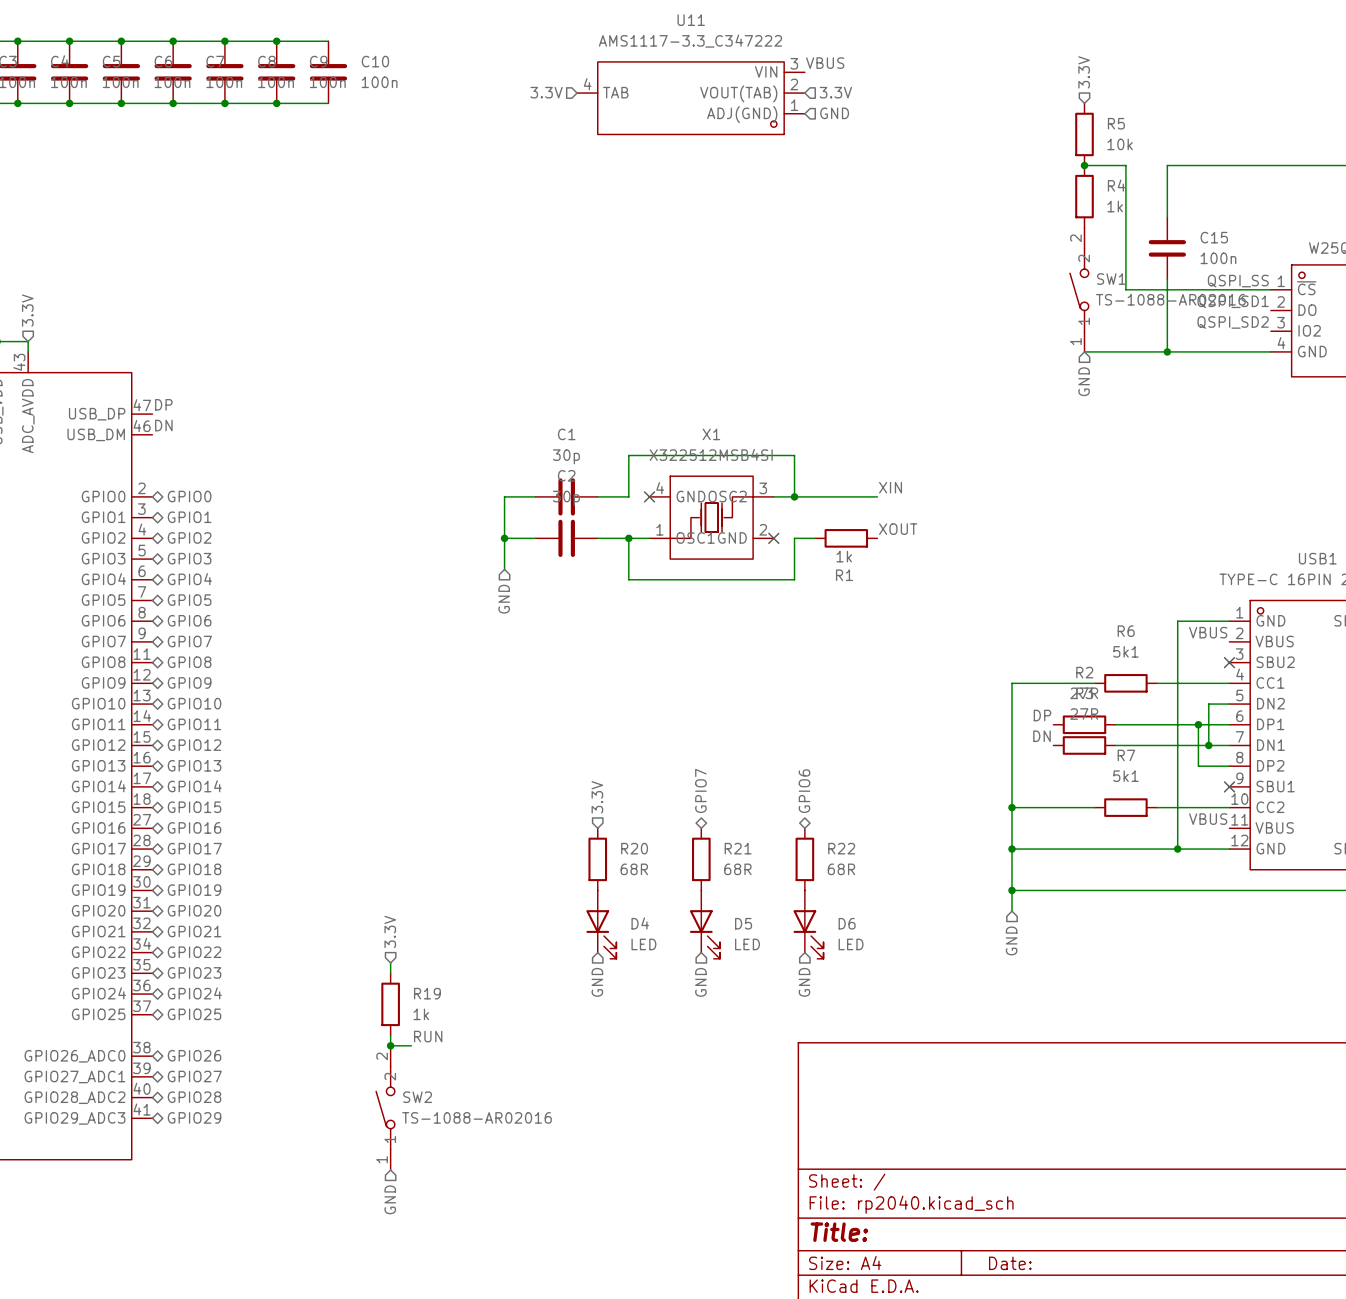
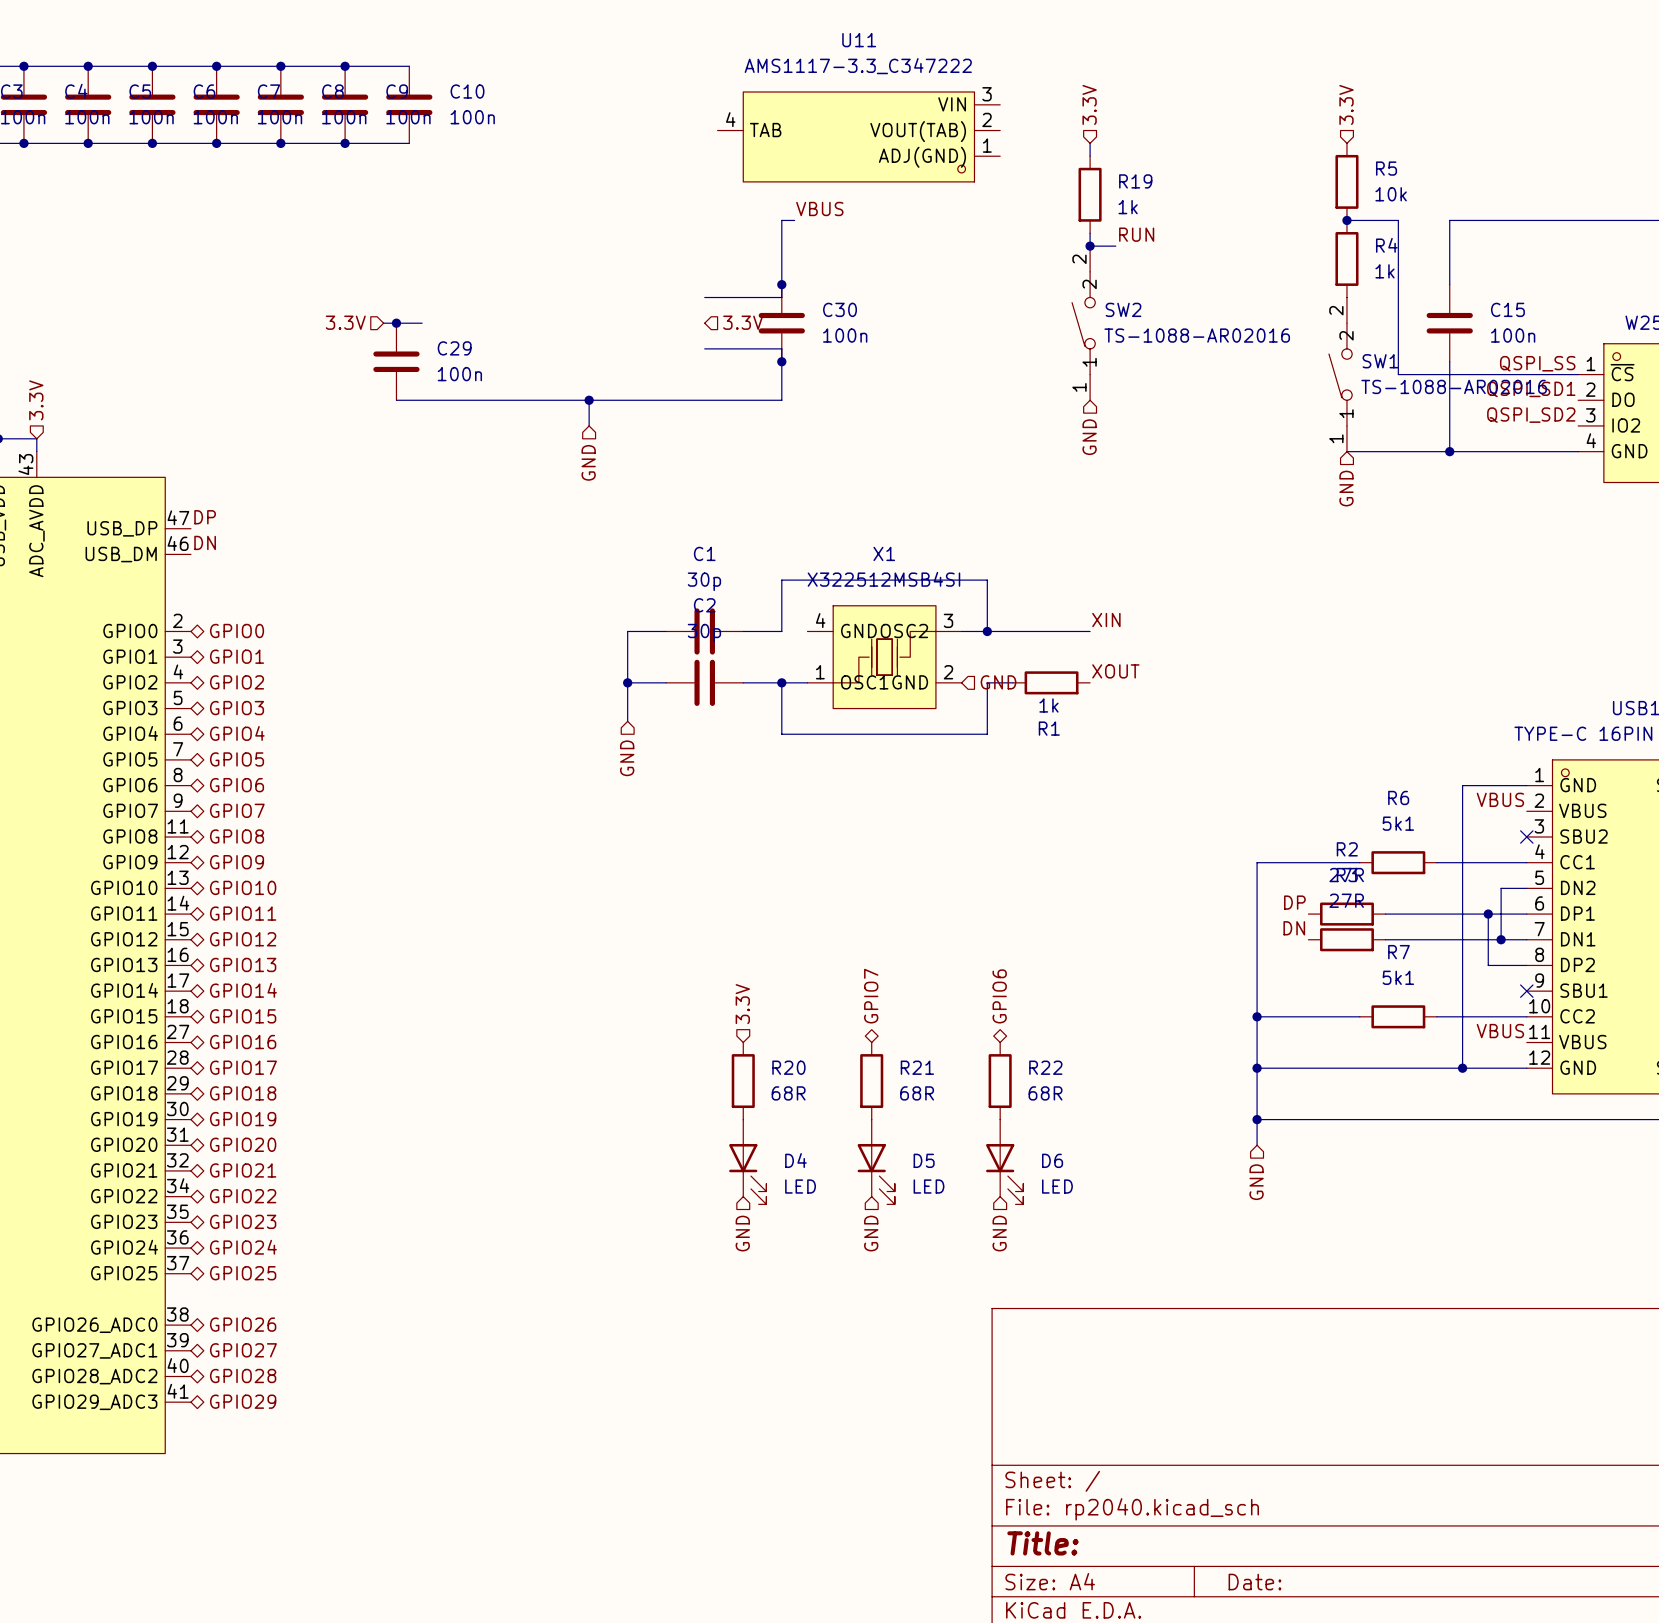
label position: VBUS (825, 63) -> VBUS (819, 208)
hierarchical label: 3.3V (546, 92) -> none
hierarchical label rotation: 0° (835, 92) -> 90° counterclockwise (1089, 104)
hierarchical label position: 3.3V (835, 92) -> 3.3V (1089, 104)
wire: none -> (1090, 143) (1090, 156)
hierarchical label: GND (834, 113) -> none
wire: none -> (794, 220) (781, 220) (781, 297) (704, 297)
wire: none -> (1090, 233) (1090, 246) (1115, 246)
label: none -> RUN (1136, 234)
junction: none -> (1090, 246)
junction: none -> (781, 284)
hierarchical label: none -> 3.3V (345, 322)
hierarchical label: none -> 3.3V (743, 322)
wire: none -> (383, 323) (422, 323)
junction: none -> (396, 323)
C30: none -> 100n (781, 323)
wire: none -> (704, 348) (781, 348) (781, 400) (396, 400)
C29: none -> 100n (396, 361)
junction: none -> (781, 361)
wire: none -> (589, 400) (589, 425)
junction: none -> (589, 400)
hierarchical label: none -> GND (1089, 437)
hierarchical label: none -> GND (588, 462)
no-connect mark: (649, 496) -> none
hierarchical label: none -> GND (998, 682)
no-connect mark: (773, 538) -> none
hierarchical label: 3.3V (390, 931) -> none
wire: (390, 962) (390, 973) -> none
R19 position: (390, 1004) -> (1090, 194)
wire: (390, 1035) (390, 1045) (411, 1045) -> none
label: RUN (428, 1036) -> none
junction: (390, 1045) -> none
SW2 position: (385, 1107) -> (1083, 323)
hierarchical label: GND (390, 1199) -> none

